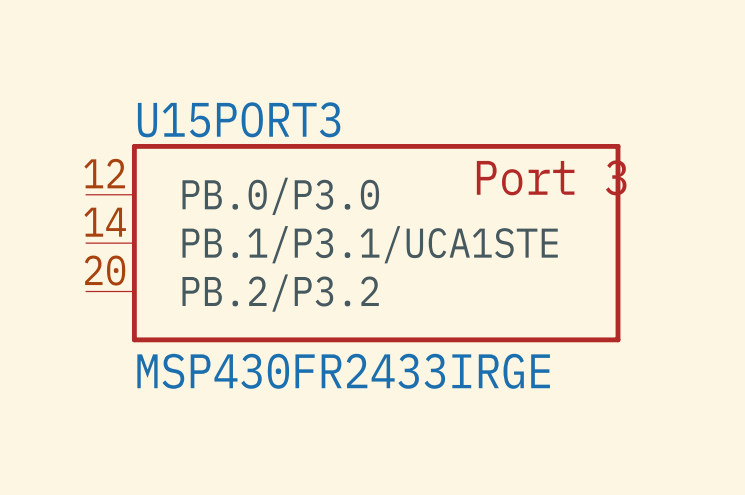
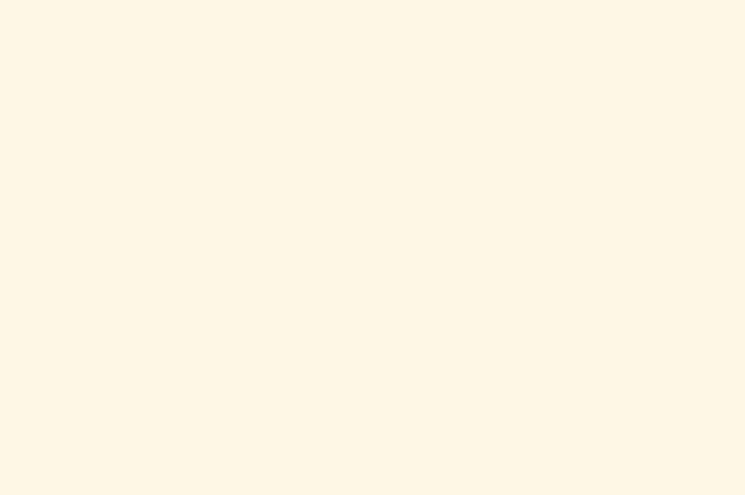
U15PORT3: (353, 243) -> none

